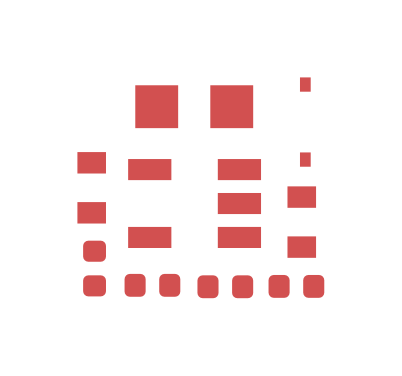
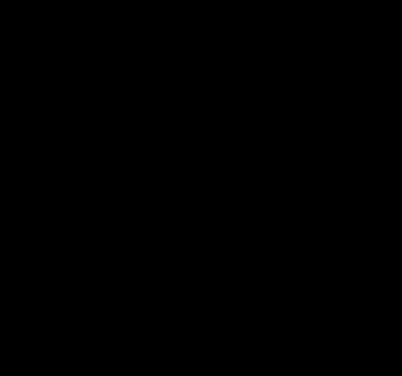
part: (194, 106) -> none
part: (305, 122) -> none
part: (91, 187) -> none
part: (194, 203) -> none
part: (301, 222) -> none
part: (94, 268) -> none
part: (152, 285) -> none
part: (225, 286) -> none
part: (296, 286) -> none

